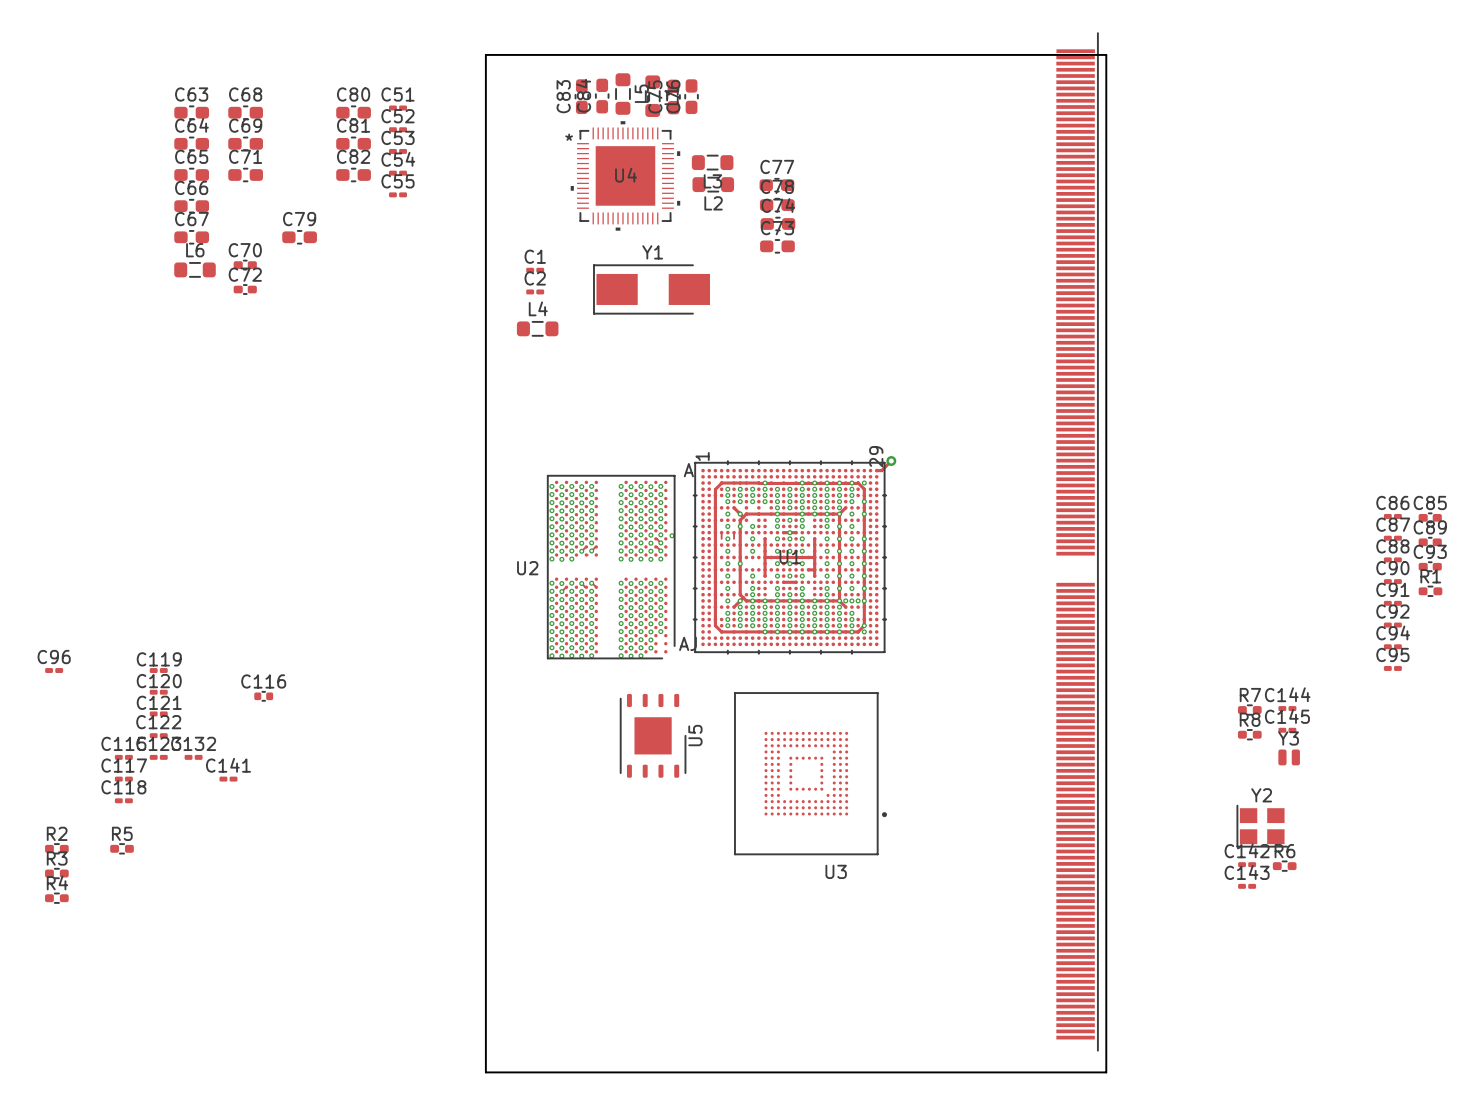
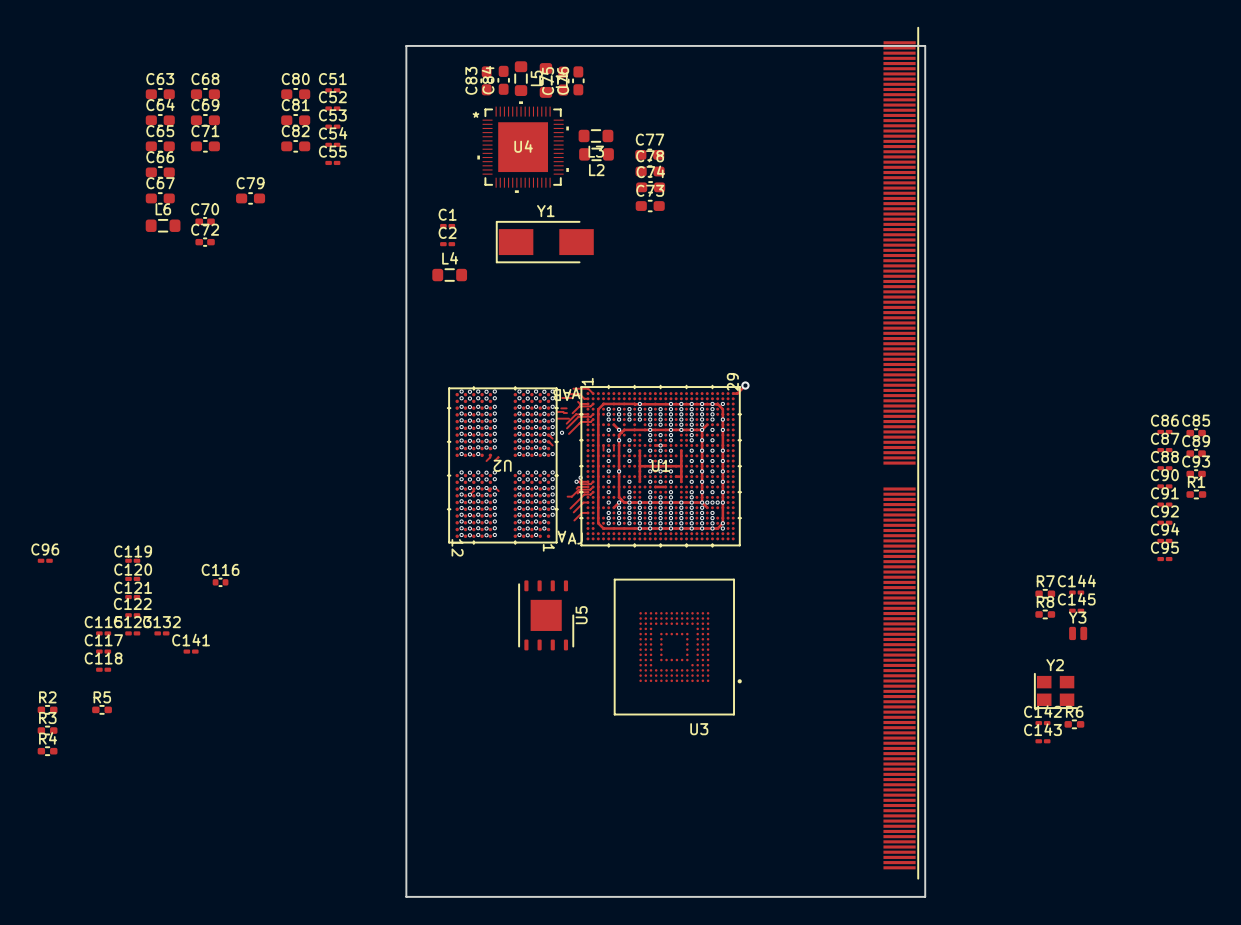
track: none -> (573, 388) (588, 388) (593, 393)
via: none -> (461, 391)
via: none -> (469, 391)
via: none -> (478, 391)
via: none -> (486, 391)
via: none -> (494, 391)
via: none -> (519, 391)
via: none -> (527, 391)
via: none -> (536, 391)
via: none -> (544, 391)
via: none -> (552, 391)
track: none -> (570, 394) (579, 394) (584, 398) (587, 398)
U2 footprint: [547, 475, 676, 660] -> [446, 386, 559, 545]
track: none -> (562, 398) (572, 398)
via: none -> (461, 398)
via: none -> (469, 398)
via: none -> (478, 398)
via: none -> (486, 398)
via: none -> (494, 398)
via: none -> (519, 398)
via: none -> (527, 398)
via: none -> (536, 398)
via: none -> (544, 398)
via: none -> (552, 398)
track: none -> (578, 401) (580, 403) (587, 403)
track: none -> (593, 403) (590, 406) (579, 406) (572, 413)
track: none -> (561, 408) (566, 408)
track: none -> (557, 411) (566, 413)
track: none -> (587, 414) (576, 414) (566, 423)
track: none -> (593, 414) (590, 416) (578, 416) (566, 428)
track: none -> (557, 418) (568, 418)
track: none -> (593, 419) (590, 421) (580, 421) (568, 433)
via: none -> (562, 432)
via: (660, 526) -> none
via: (660, 534) -> none
via: (672, 535) -> none
track: (655, 538) (660, 542) -> (548, 435) (552, 438)
via: (591, 542) -> none
via: (581, 543) -> none
track: (655, 546) (660, 550) -> (548, 442) (552, 445)
via: (551, 550) -> none
via: (571, 550) -> none
via: (591, 550) -> none
via: (621, 550) -> none
via: (640, 550) -> none
via: (660, 550) -> none
via: (561, 551) -> none
via: (581, 551) -> none
via: (631, 551) -> none
via: (650, 551) -> none
via: (551, 559) -> none
via: (561, 559) -> none
via: (571, 559) -> none
via: (621, 559) -> none
via: (631, 559) -> none
via: (640, 559) -> none
via: (650, 559) -> none
via: (660, 559) -> none
via: none -> (461, 472)
via: none -> (478, 472)
via: none -> (494, 472)
via: none -> (519, 472)
via: none -> (536, 472)
via: none -> (552, 472)
via: none -> (469, 472)
via: none -> (486, 472)
via: none -> (527, 472)
via: none -> (544, 472)
U2 name position: U2 (527, 568) -> U2 (502, 465)
track: none -> (580, 477) (582, 481) (587, 481)
via: none -> (580, 477)
via: none -> (461, 479)
via: none -> (478, 479)
via: none -> (494, 479)
via: none -> (519, 479)
via: none -> (536, 479)
via: none -> (552, 479)
via: none -> (469, 479)
via: none -> (486, 479)
via: none -> (527, 479)
via: none -> (544, 479)
track: none -> (576, 481) (588, 484)
via: none -> (576, 481)
track: none -> (593, 481) (589, 484)
track: none -> (587, 486) (576, 488)
track: none -> (593, 486) (590, 489) (578, 489) (571, 496) (567, 496)
track: none -> (587, 492) (577, 493)
track: none -> (593, 492) (590, 494) (584, 494) (570, 508)
track: none -> (587, 502) (583, 502) (573, 512)
track: none -> (587, 512) (581, 512) (574, 520)
via: (660, 623) -> none
via: (660, 631) -> none
via: (650, 639) -> none
via: (551, 647) -> none
via: (571, 647) -> none
via: (591, 647) -> none
via: (621, 647) -> none
via: (640, 647) -> none
via: (561, 648) -> none
via: (581, 648) -> none
via: (631, 648) -> none
via: (650, 648) -> none
via: (551, 655) -> none
via: (571, 655) -> none
via: (591, 655) -> none
via: (621, 655) -> none
via: (640, 655) -> none
via: (561, 656) -> none
via: (581, 656) -> none
via: (631, 656) -> none

